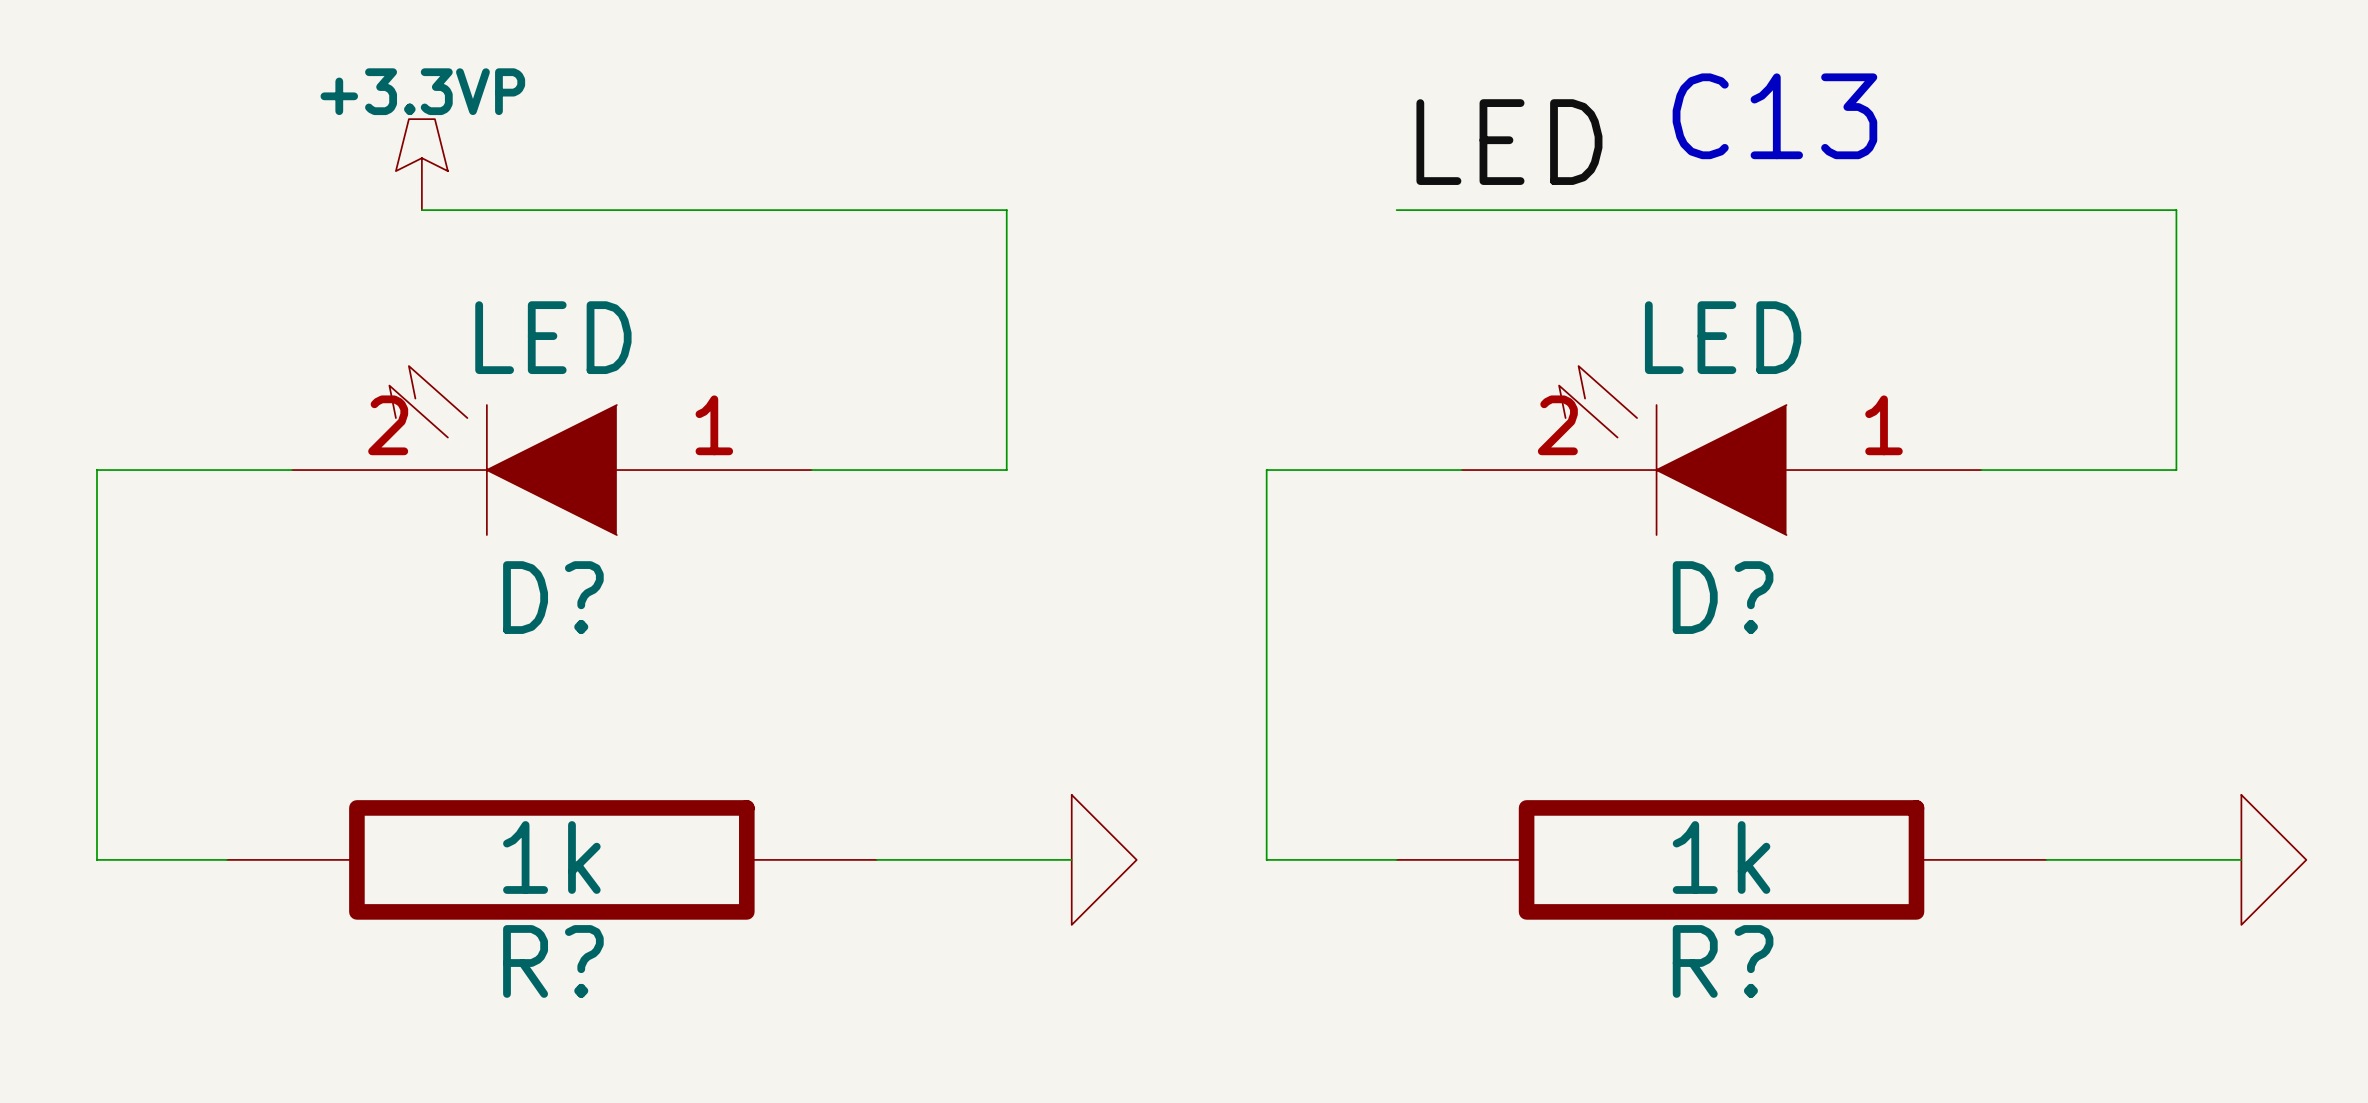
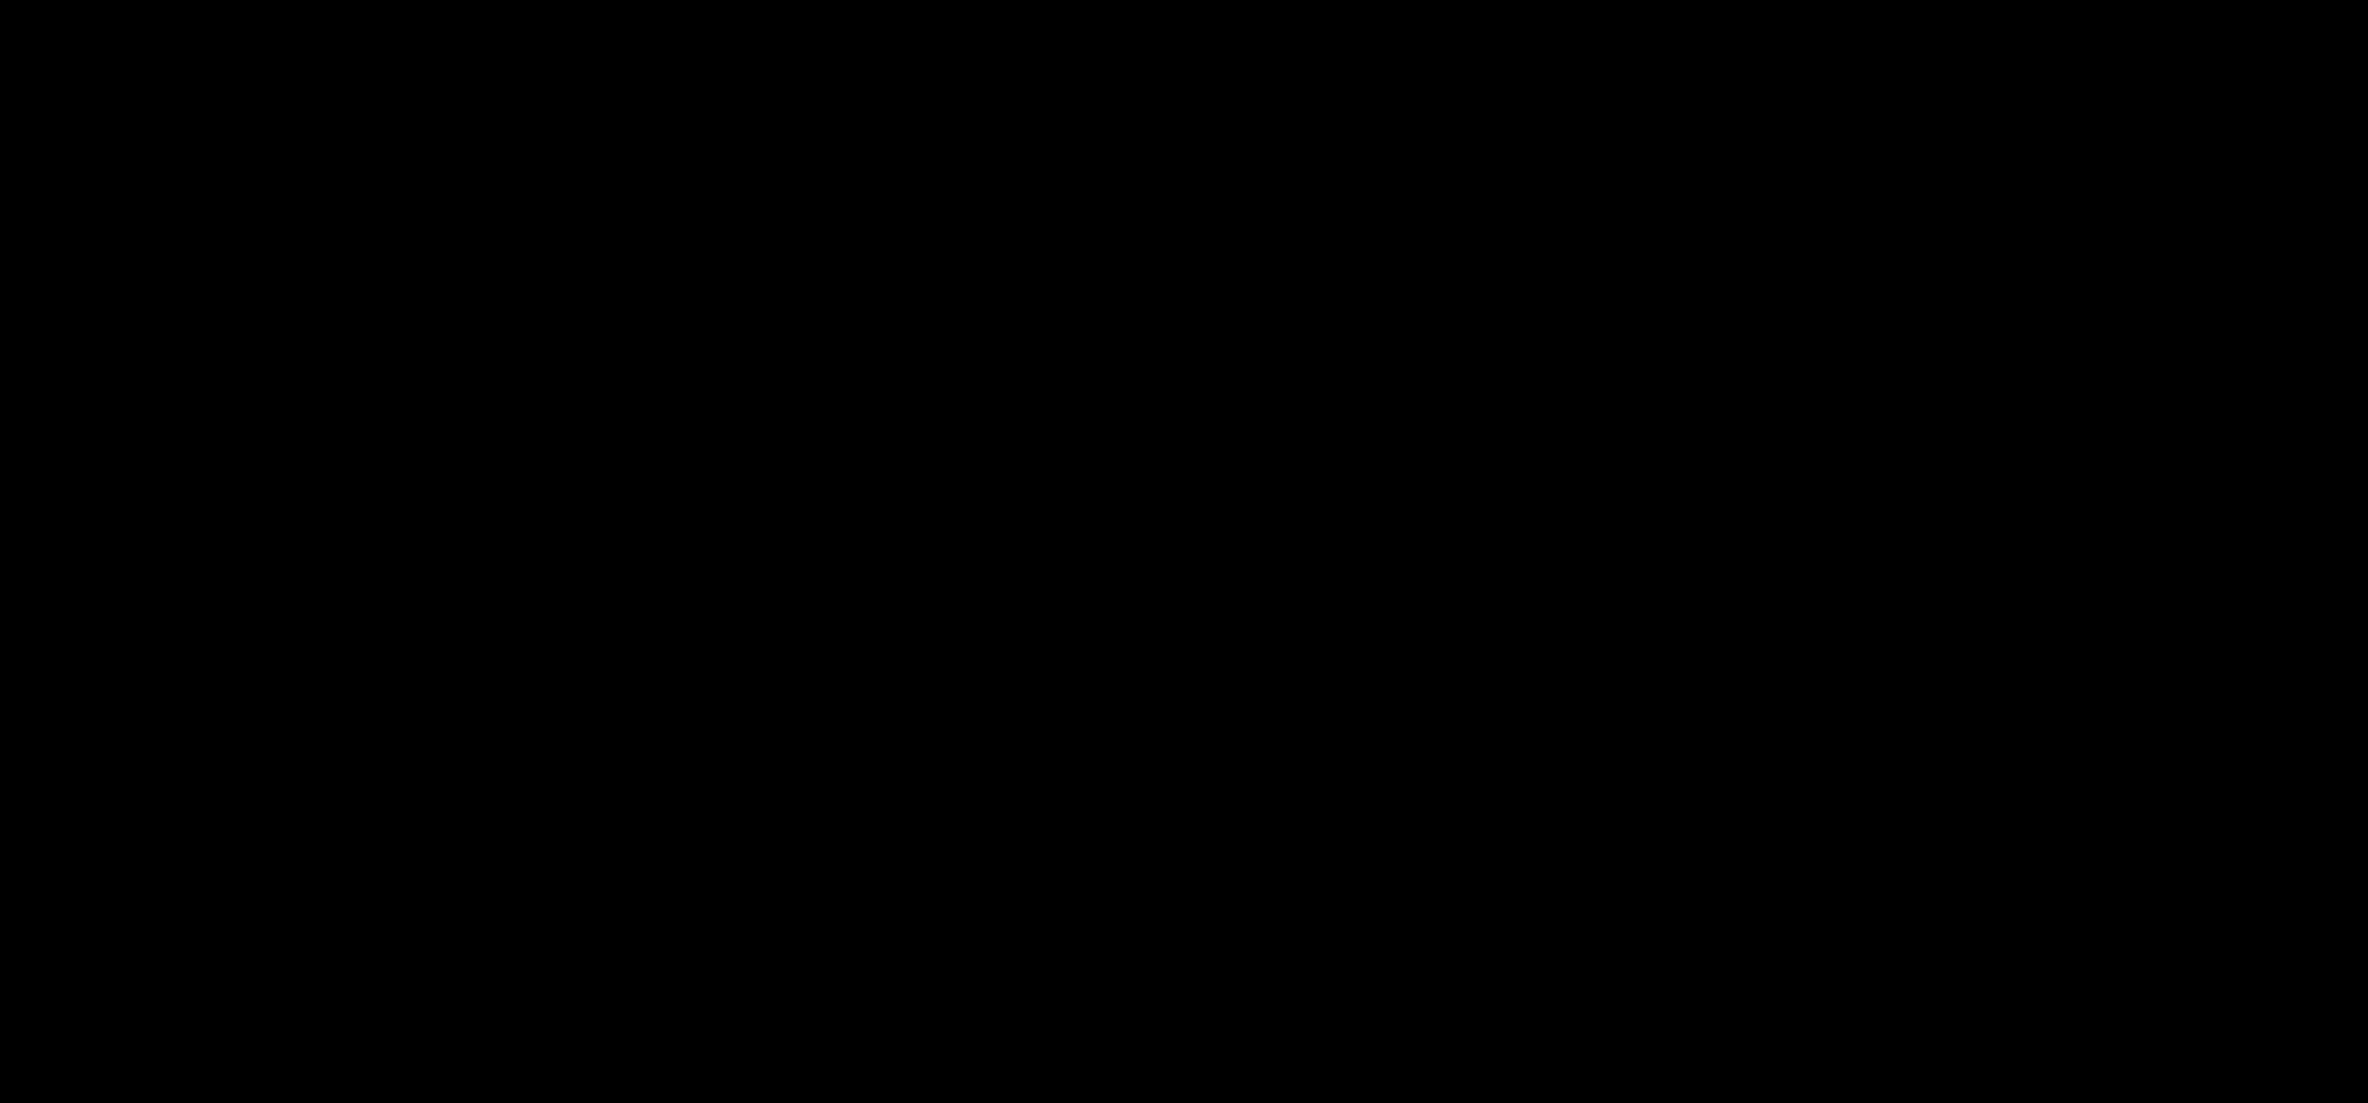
text: C13 (1774, 116) -> none
label: LED (1509, 142) -> none
power symbol: +3.3VP (421, 164) -> none
wire: (421, 210) (1006, 210) (1006, 470) (811, 470) -> none
wire: (1396, 210) (2176, 210) (2176, 470) (1981, 470) -> none
D?: LED (551, 450) -> none
D?: LED (1721, 450) -> none
wire: (291, 470) (96, 470) (96, 859) (226, 859) -> none
wire: (1461, 470) (1266, 470) (1266, 859) (1396, 859) -> none
R?: 1k (551, 859) -> none
wire: (876, 859) (1071, 859) -> none
power symbol: (1104, 859) -> none
R?: 1k (1721, 859) -> none
wire: (2046, 859) (2241, 859) -> none
power symbol: (2273, 859) -> none

